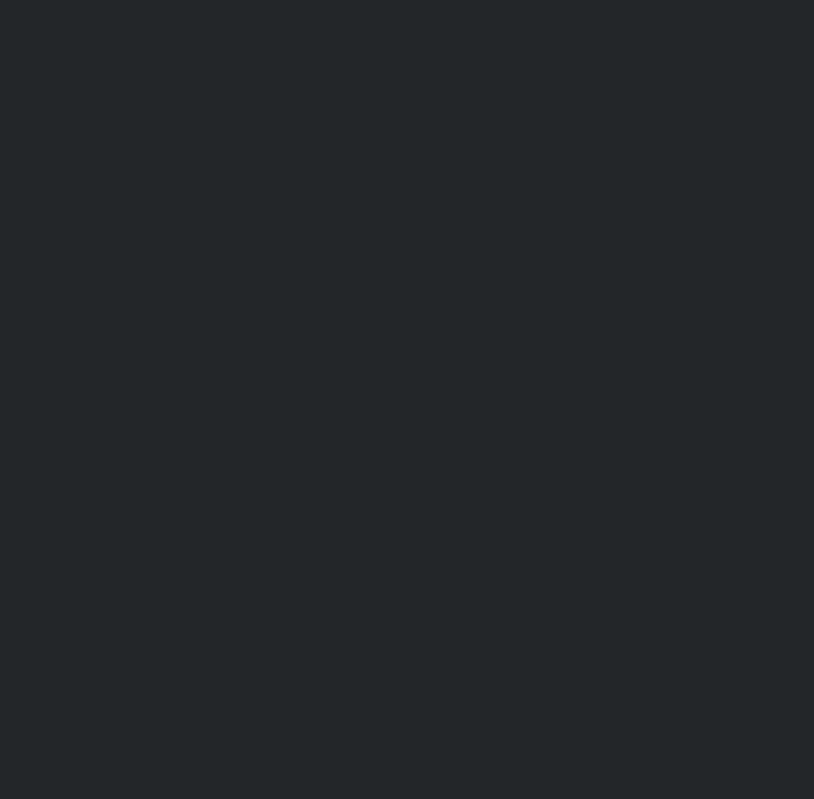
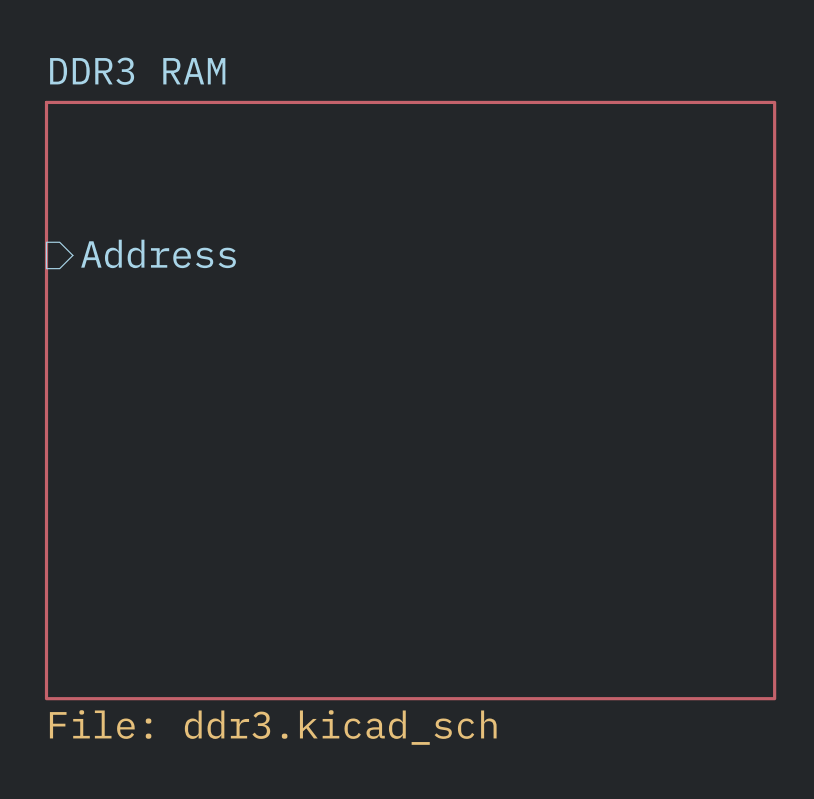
sheet pin: none -> Address (158, 253)
sheet DDR3 RAM: none -> File: ddr3.kicad_sch (410, 400)

